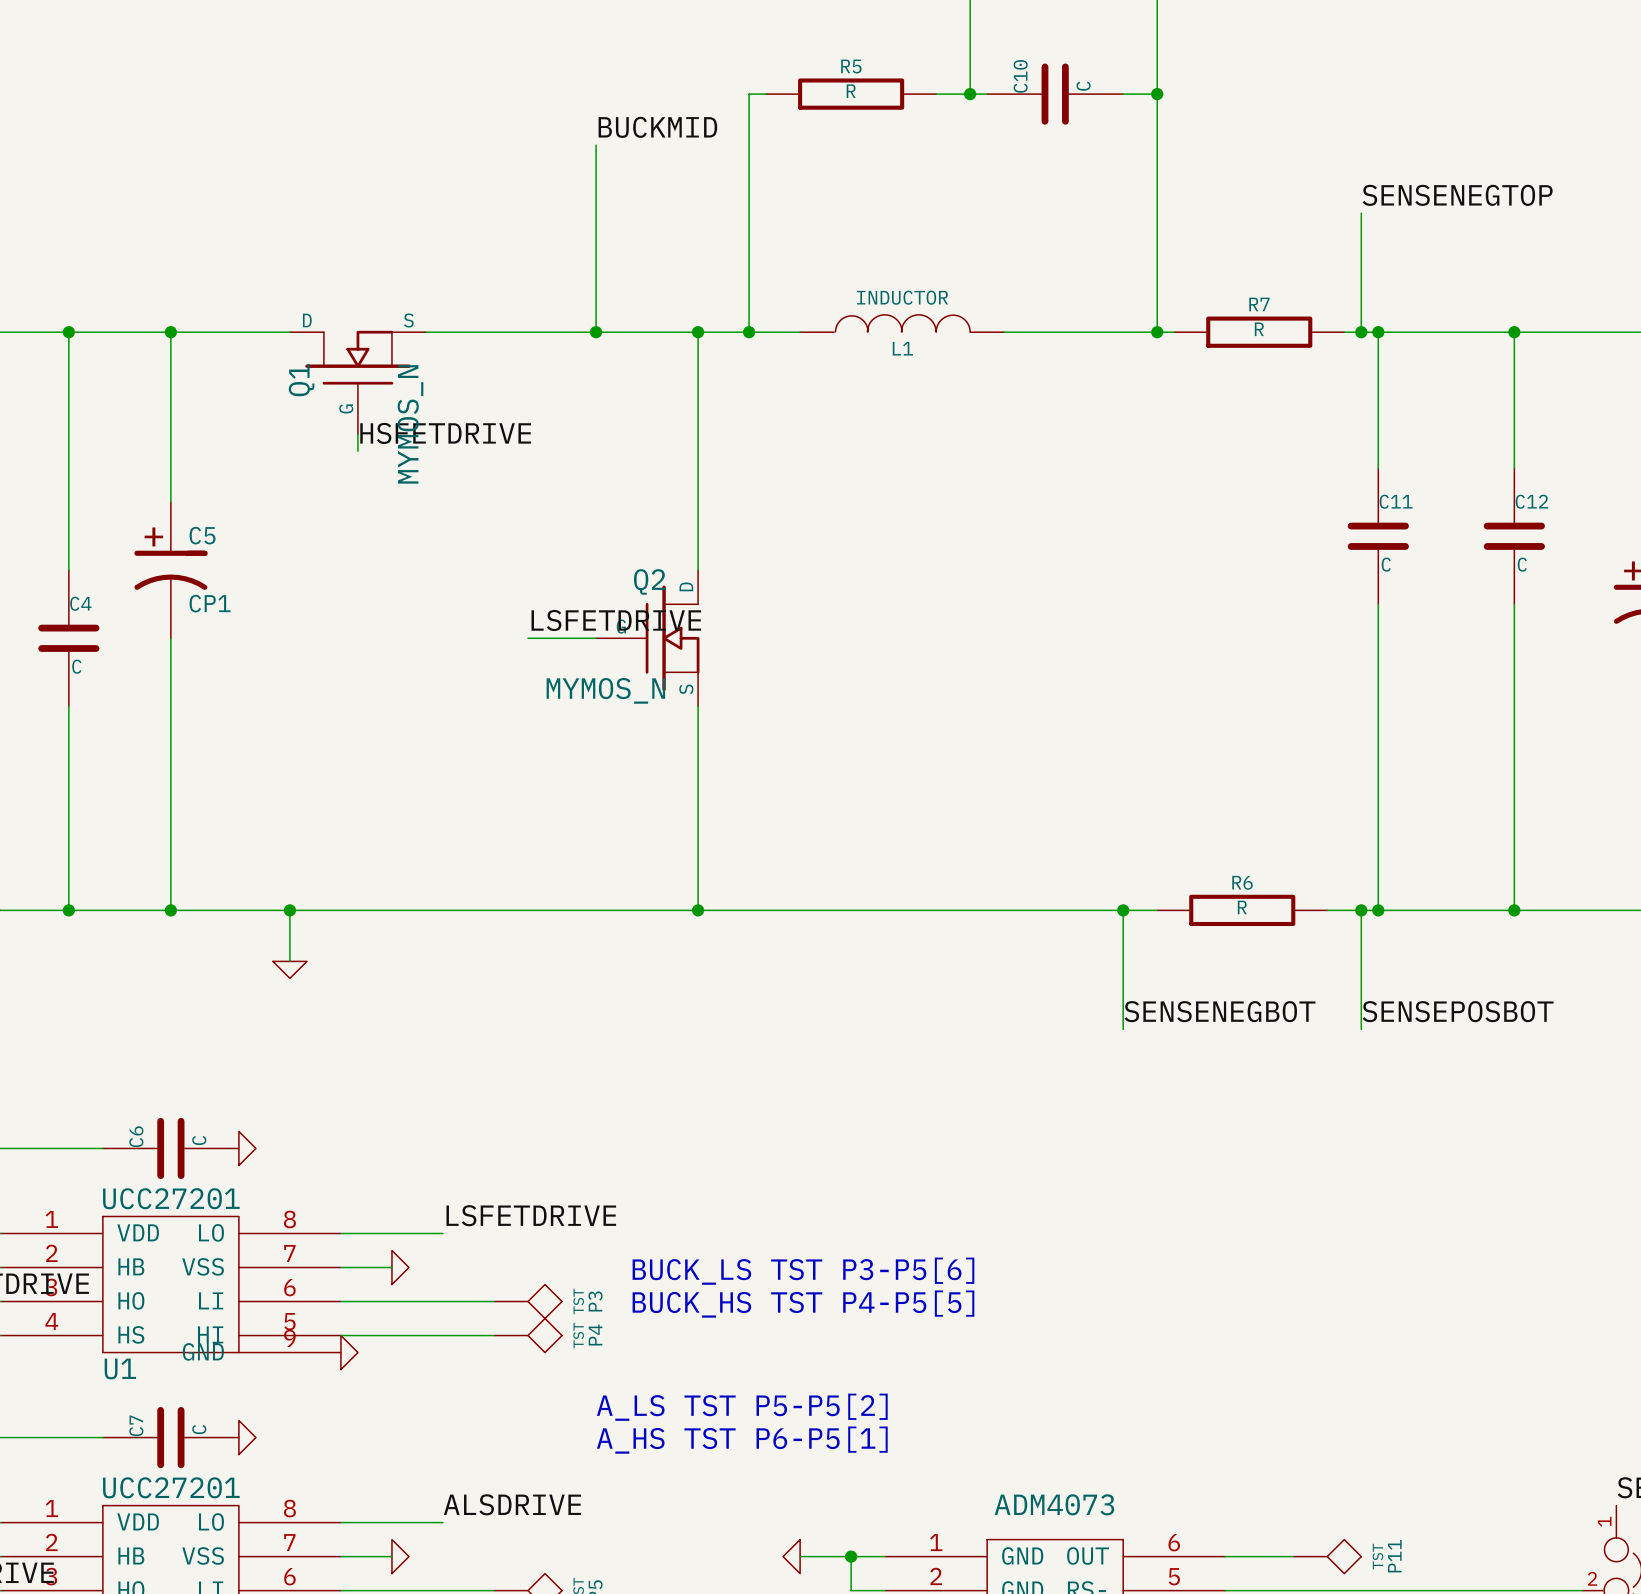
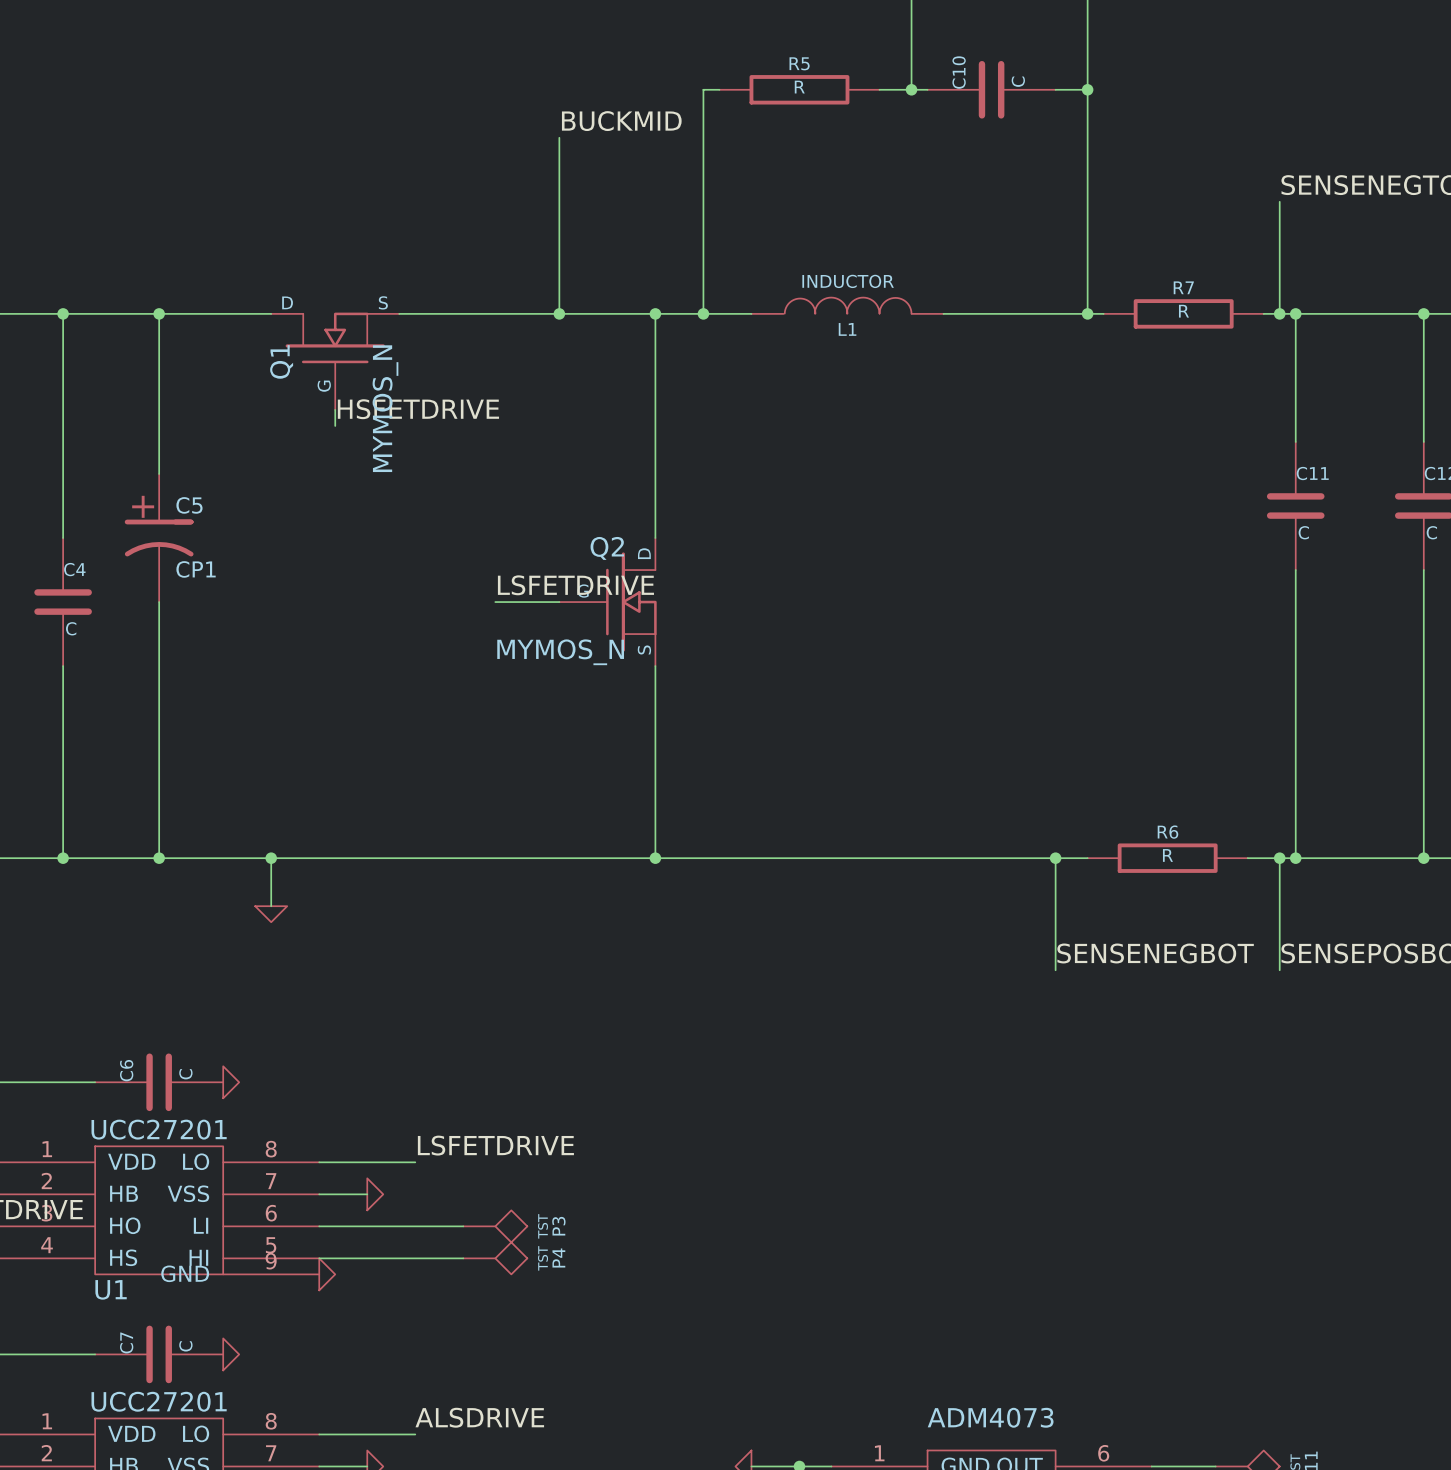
text: BUCK_LS TST P3-P5[6] (803, 1271) -> none
text: BUCK_HS TST P4-P5[5] (803, 1304) -> none
text: A_LS TST P5-P5[2] (742, 1407) -> none
text: A_HS TST P6-P5[1] (742, 1440) -> none

